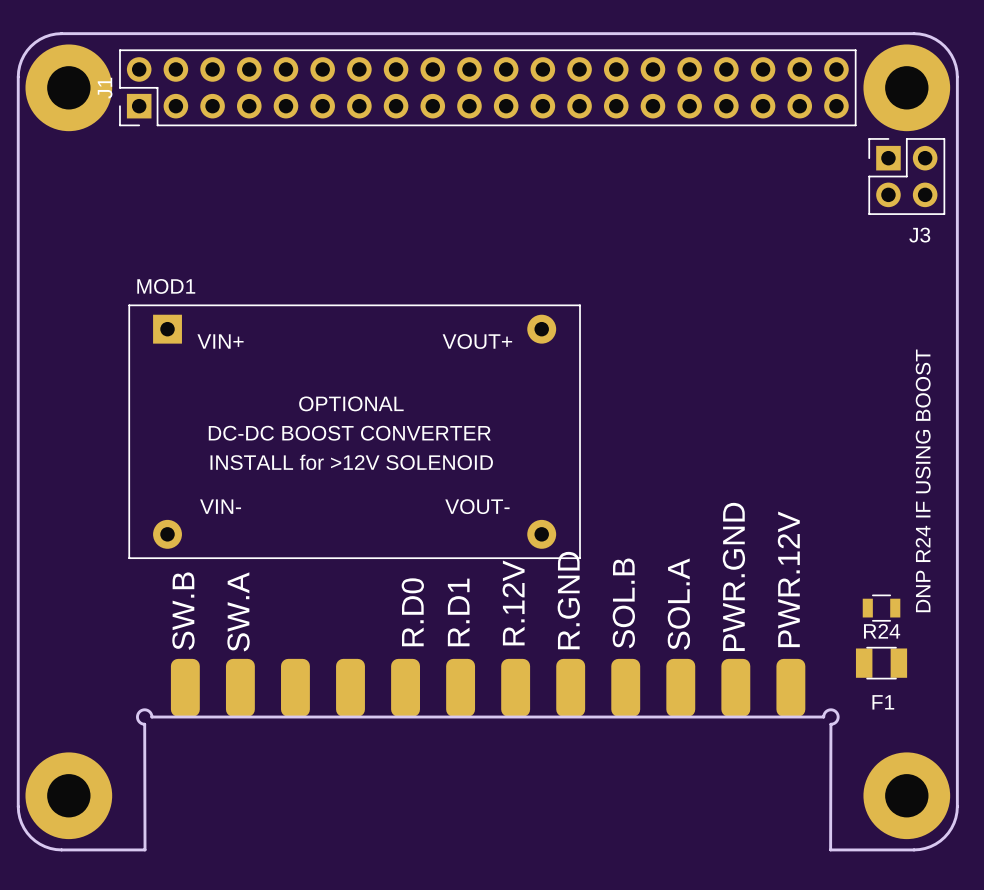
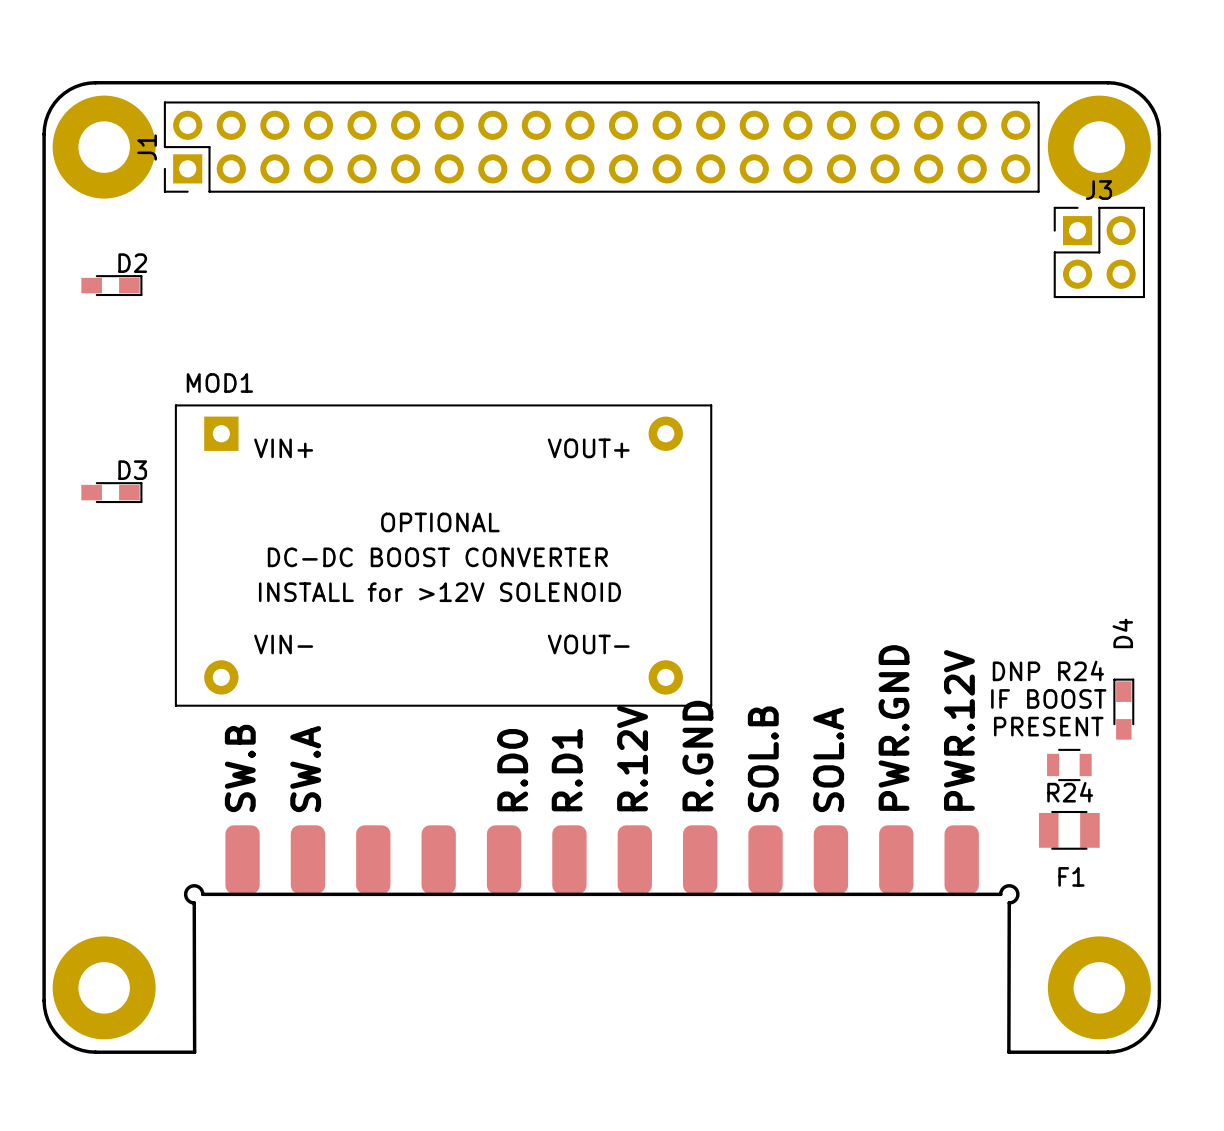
D2: none -> (111, 285)
J3 name position: J3 (919, 235) -> J3 (1098, 190)
D3: none -> (111, 492)
text: DNP R24 IF USING BOOST (923, 480) -> none
text: none -> DNP R24 (1048, 670)
text: none -> IF BOOST (1048, 698)
D4: none -> (1123, 709)
text: none -> PRESENT (1048, 726)

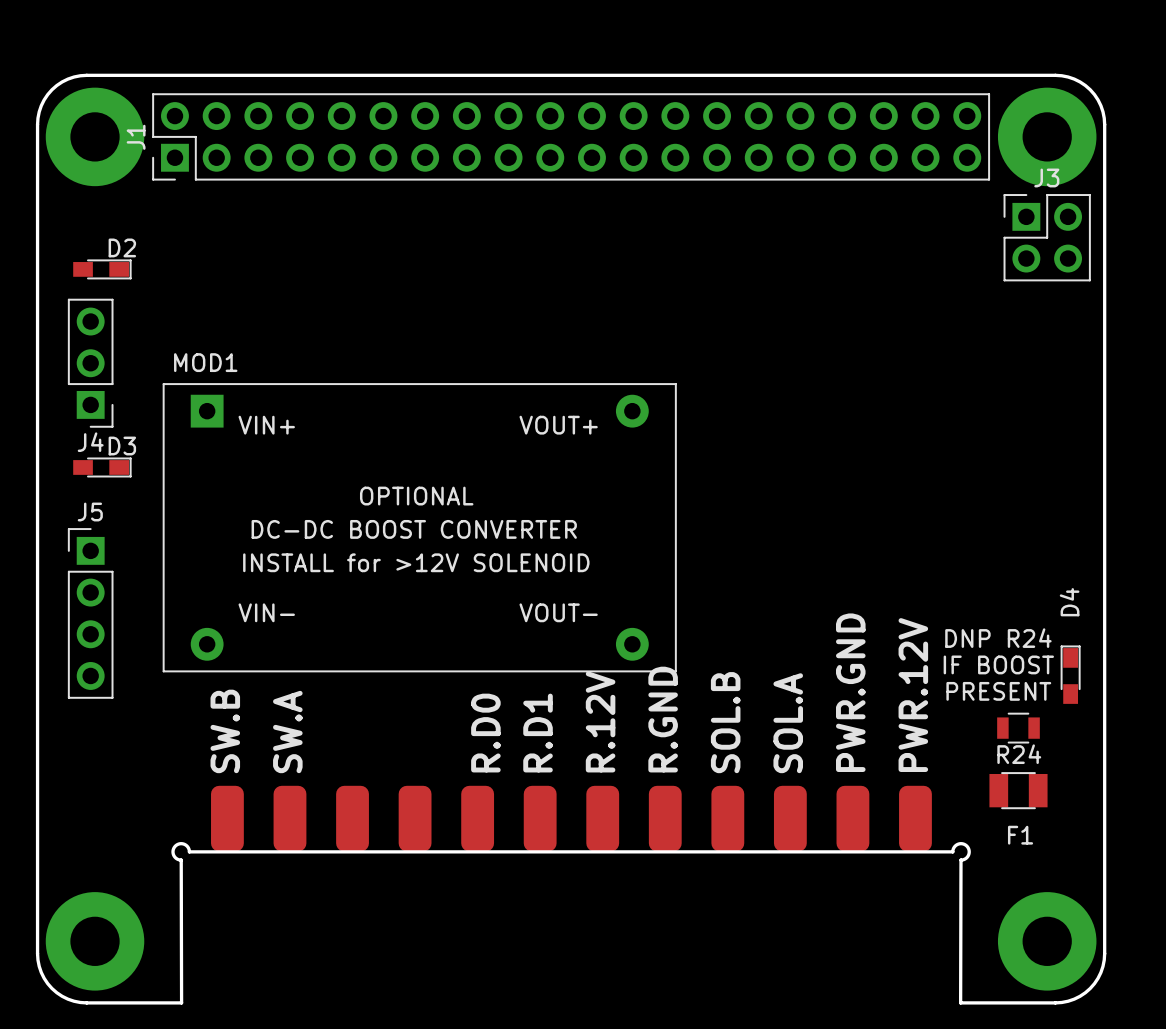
J4: none -> (90, 363)
J5: none -> (90, 613)

